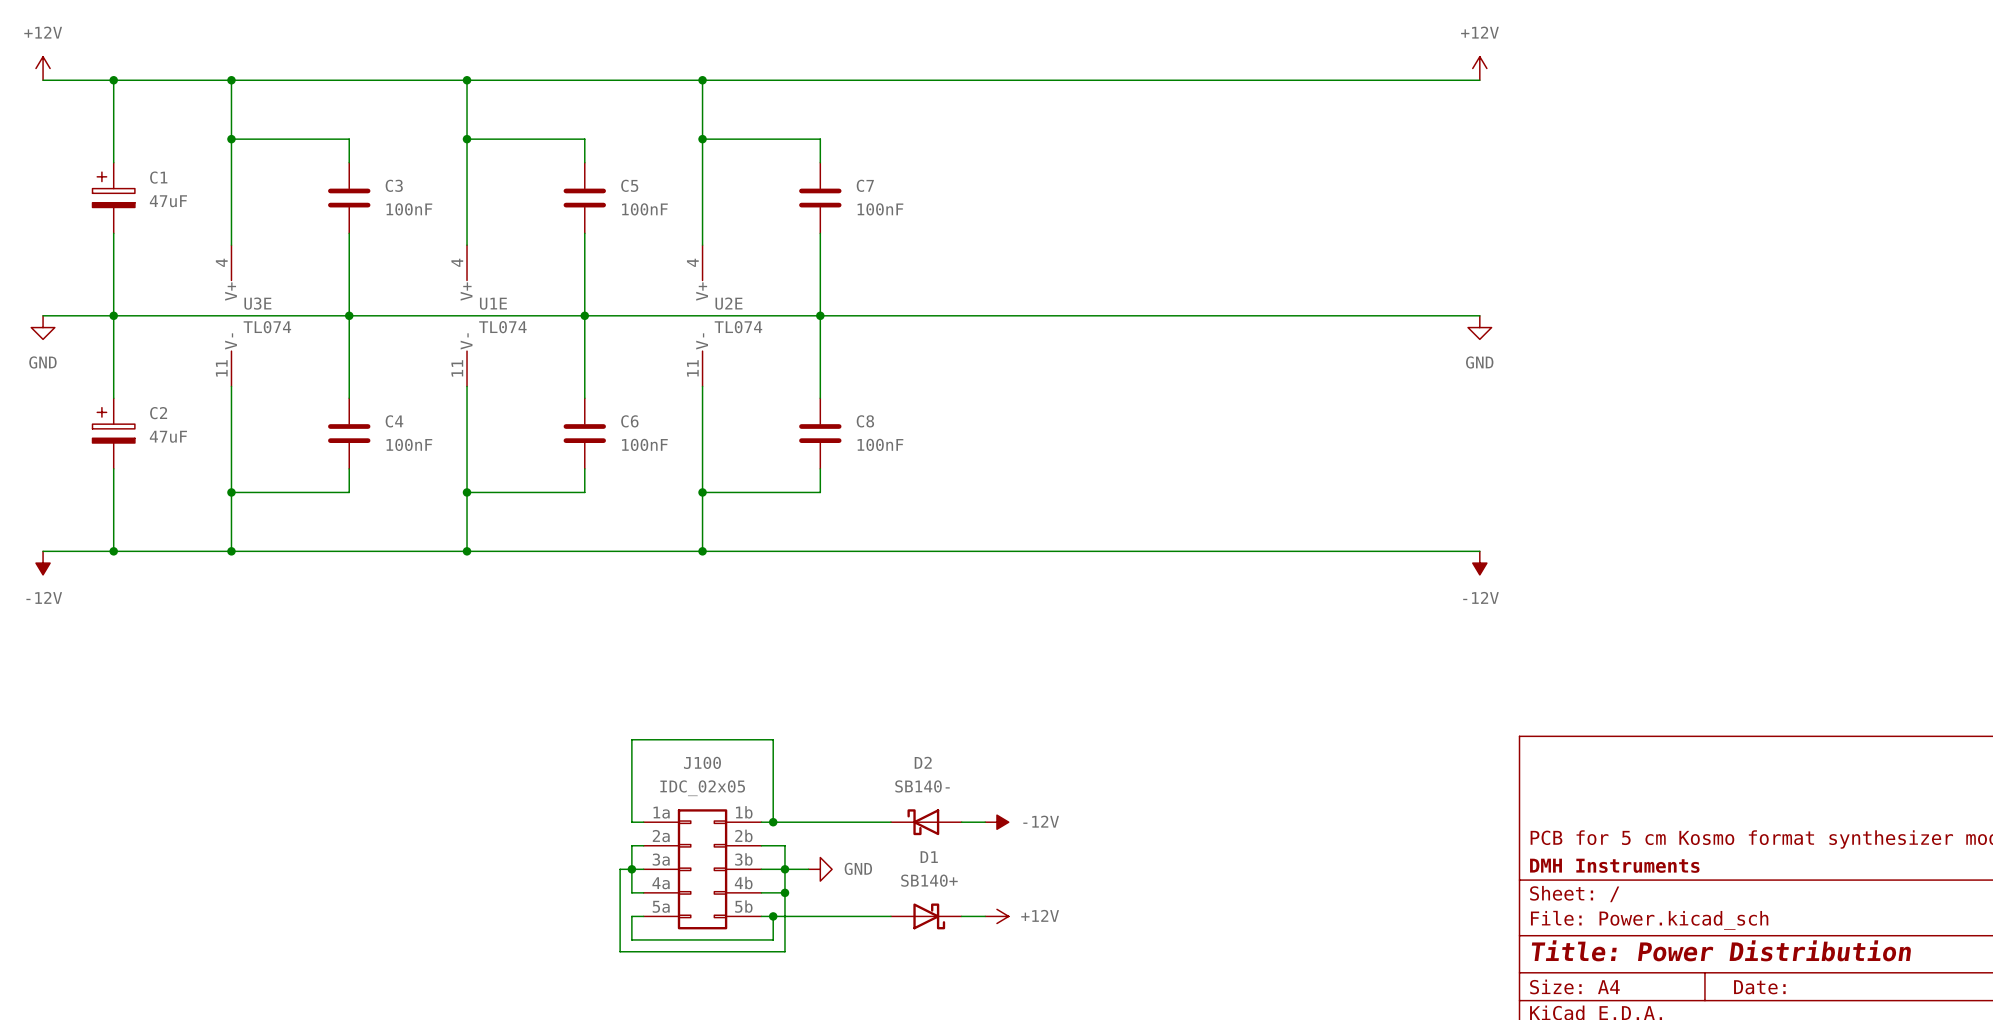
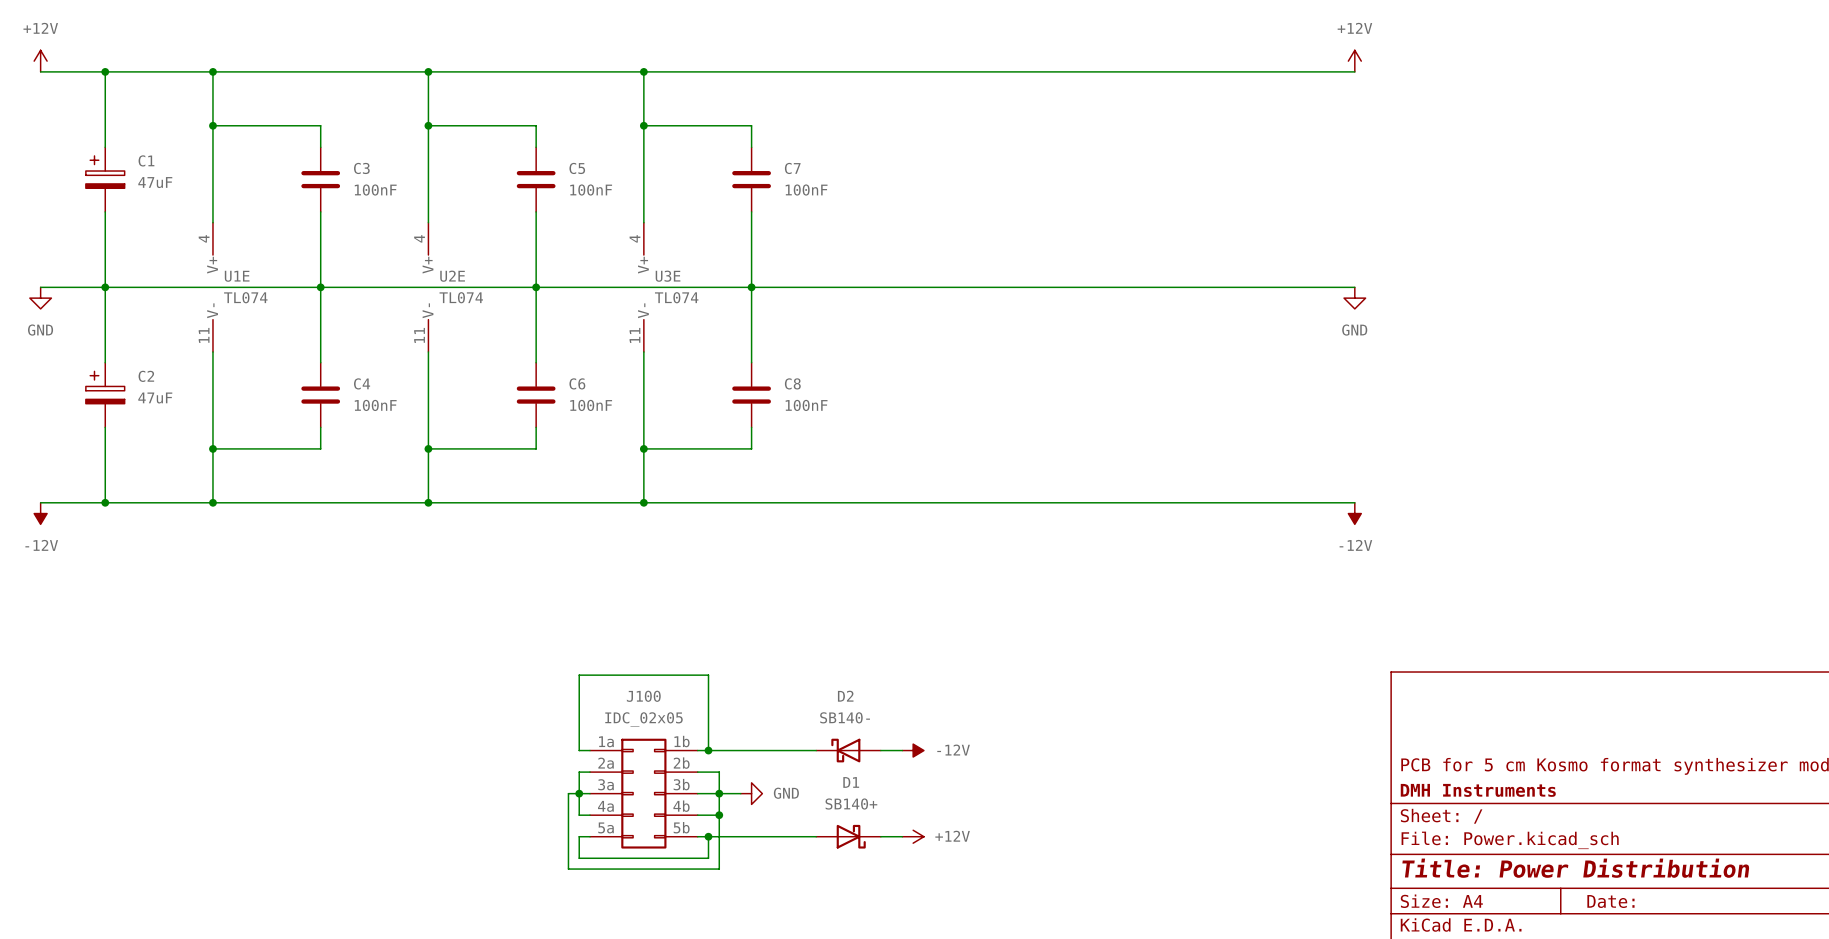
U3E name: U3E (257, 303) -> U1E (237, 276)
U1E name: U1E (493, 303) -> U2E (452, 276)
U2E name: U2E (728, 303) -> U3E (668, 276)

